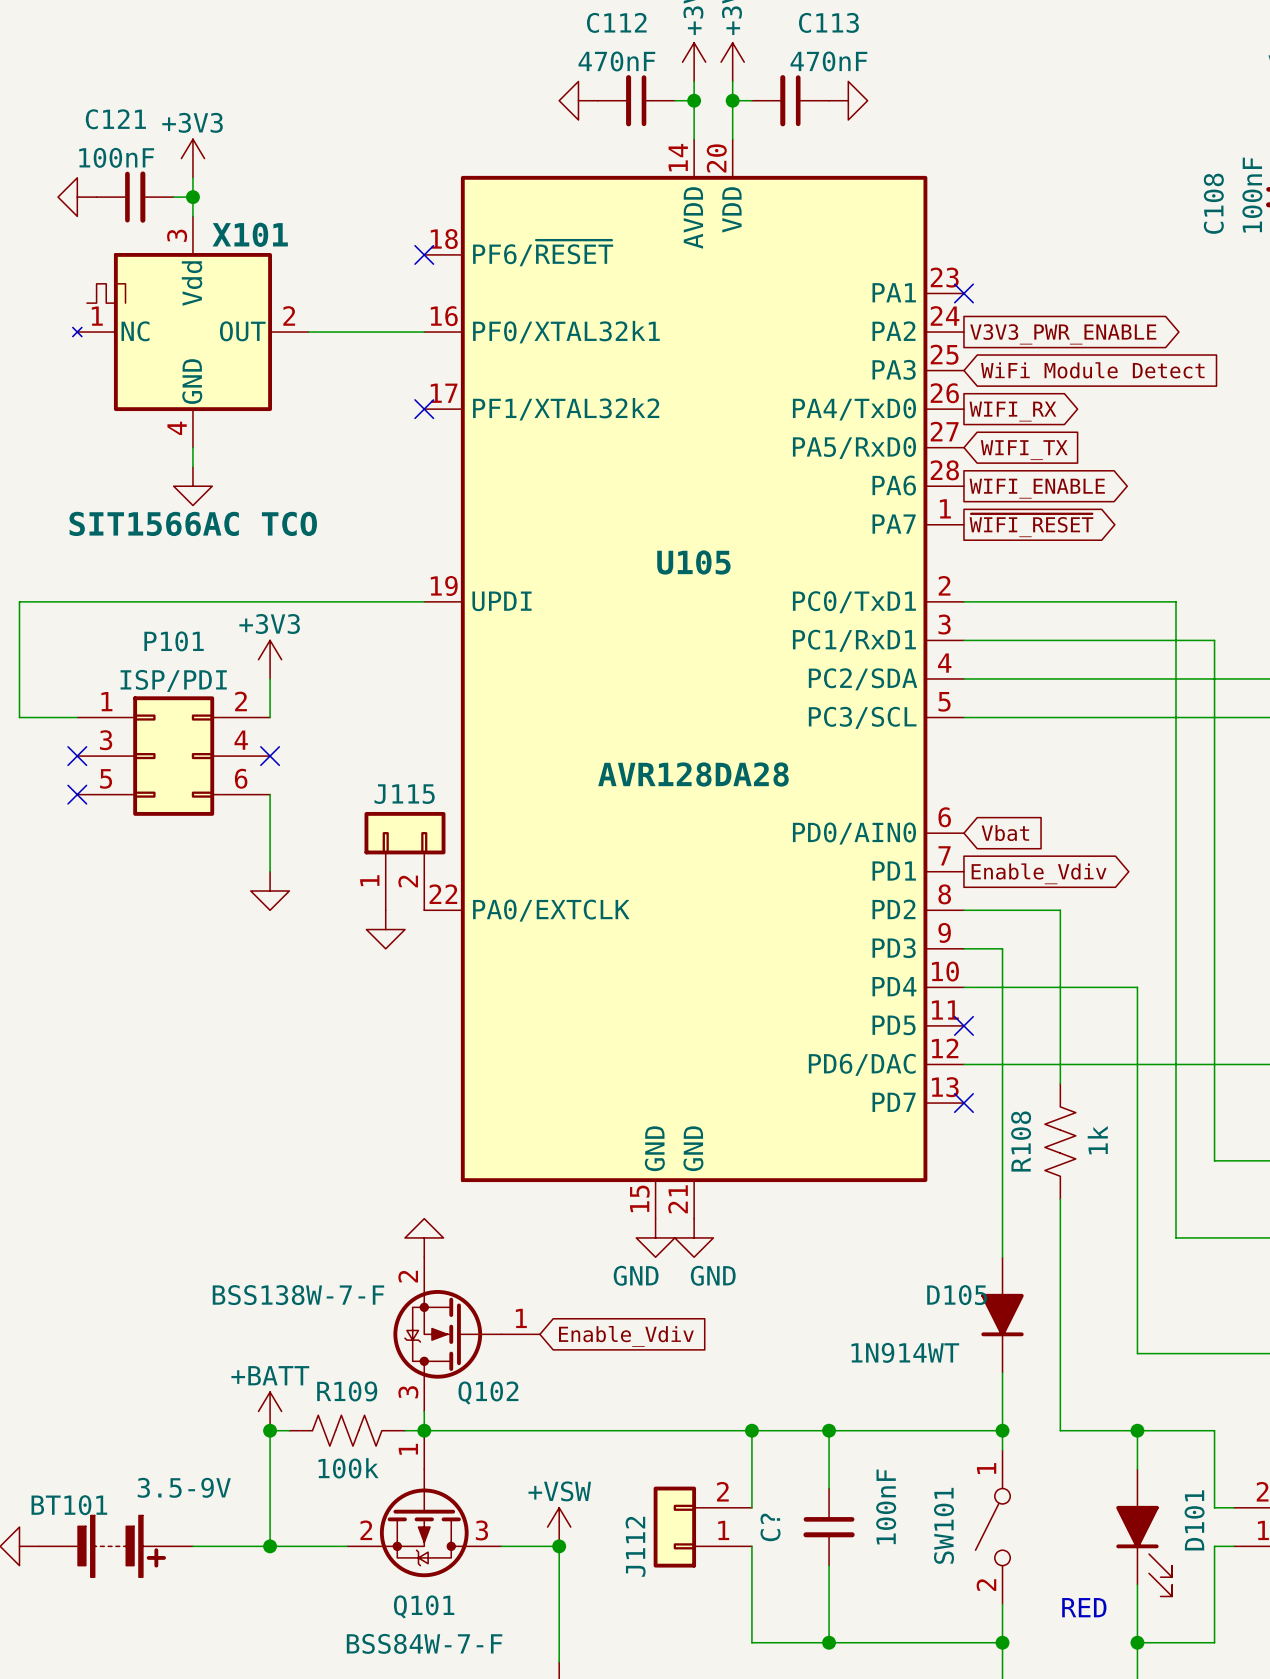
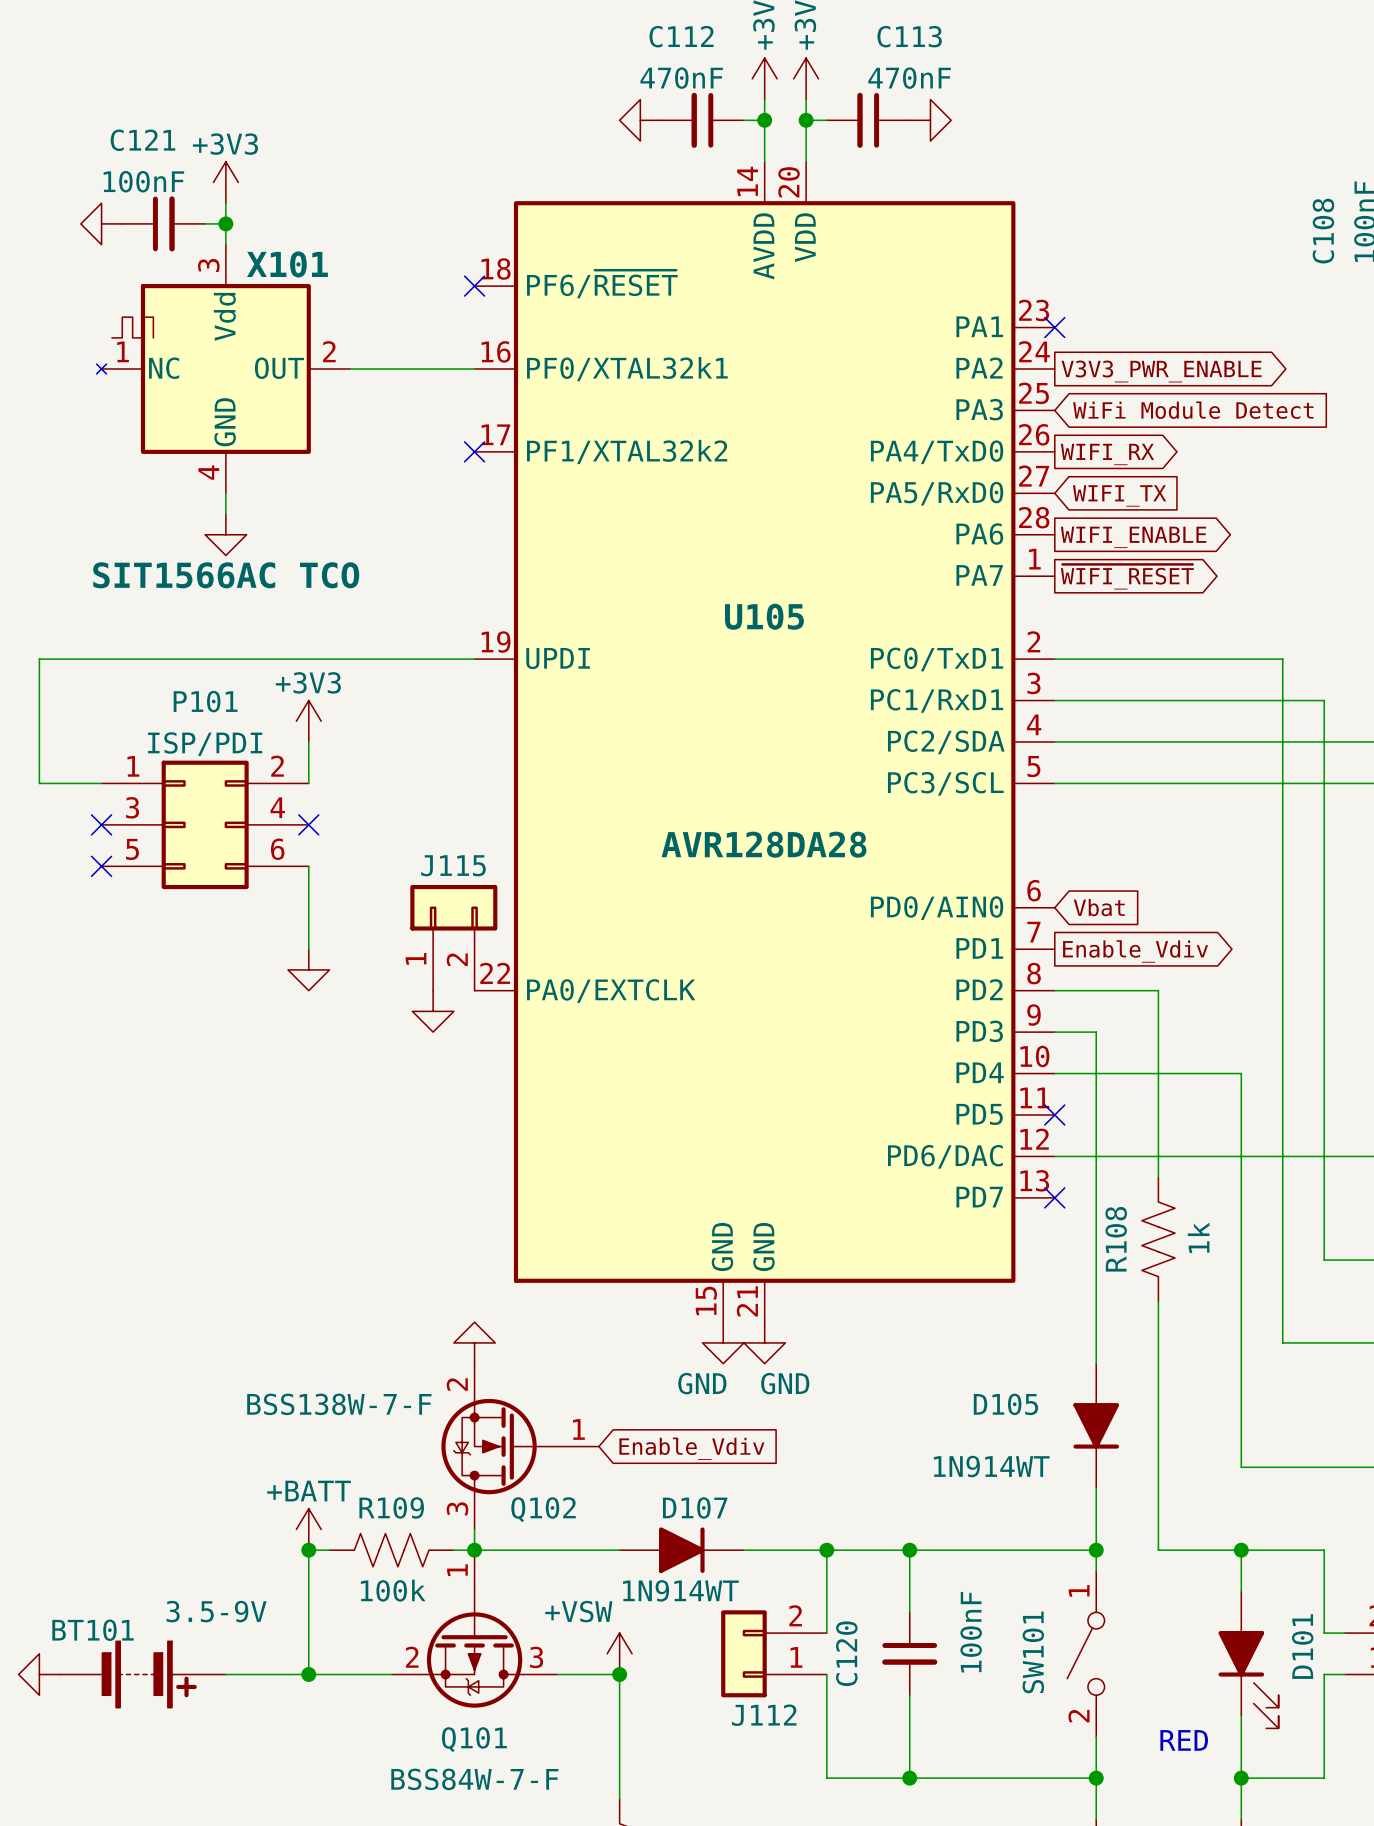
D105 name position: D105 (957, 1295) -> D105 (1005, 1404)
D107: none -> 1N914WT (681, 1550)
power symbol text position: +VSW (559, 1491) -> +VSW (578, 1611)
C? name: C? (770, 1527) -> C120 (846, 1653)
J112 name rotation: 0° (635, 1546) -> 90° clockwise (764, 1715)

